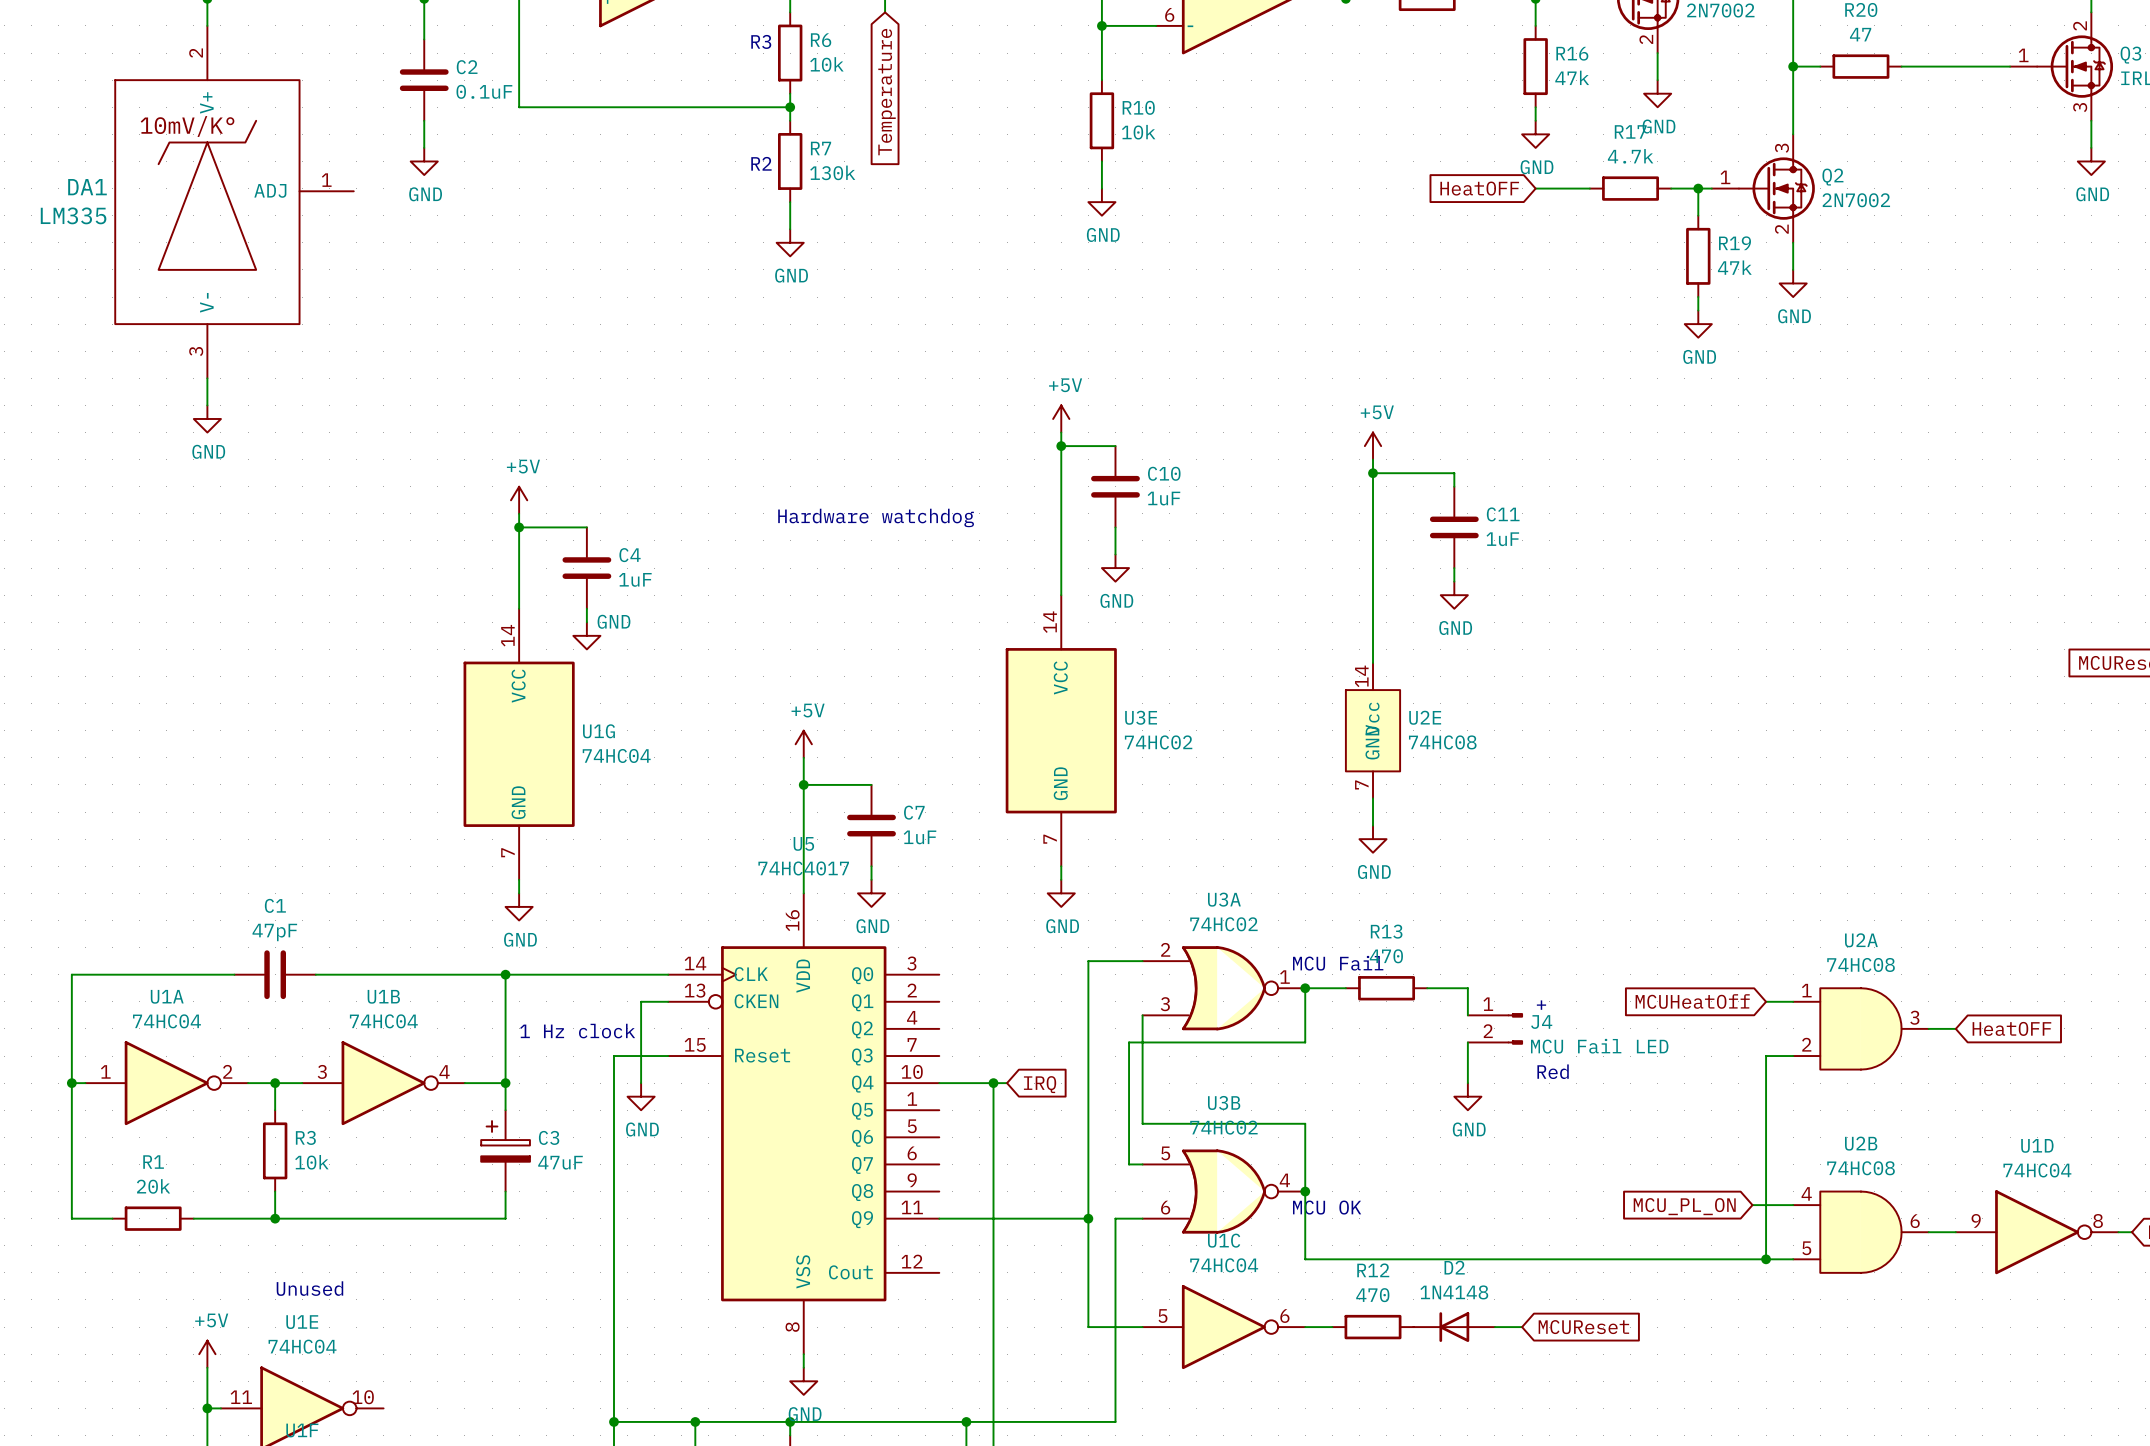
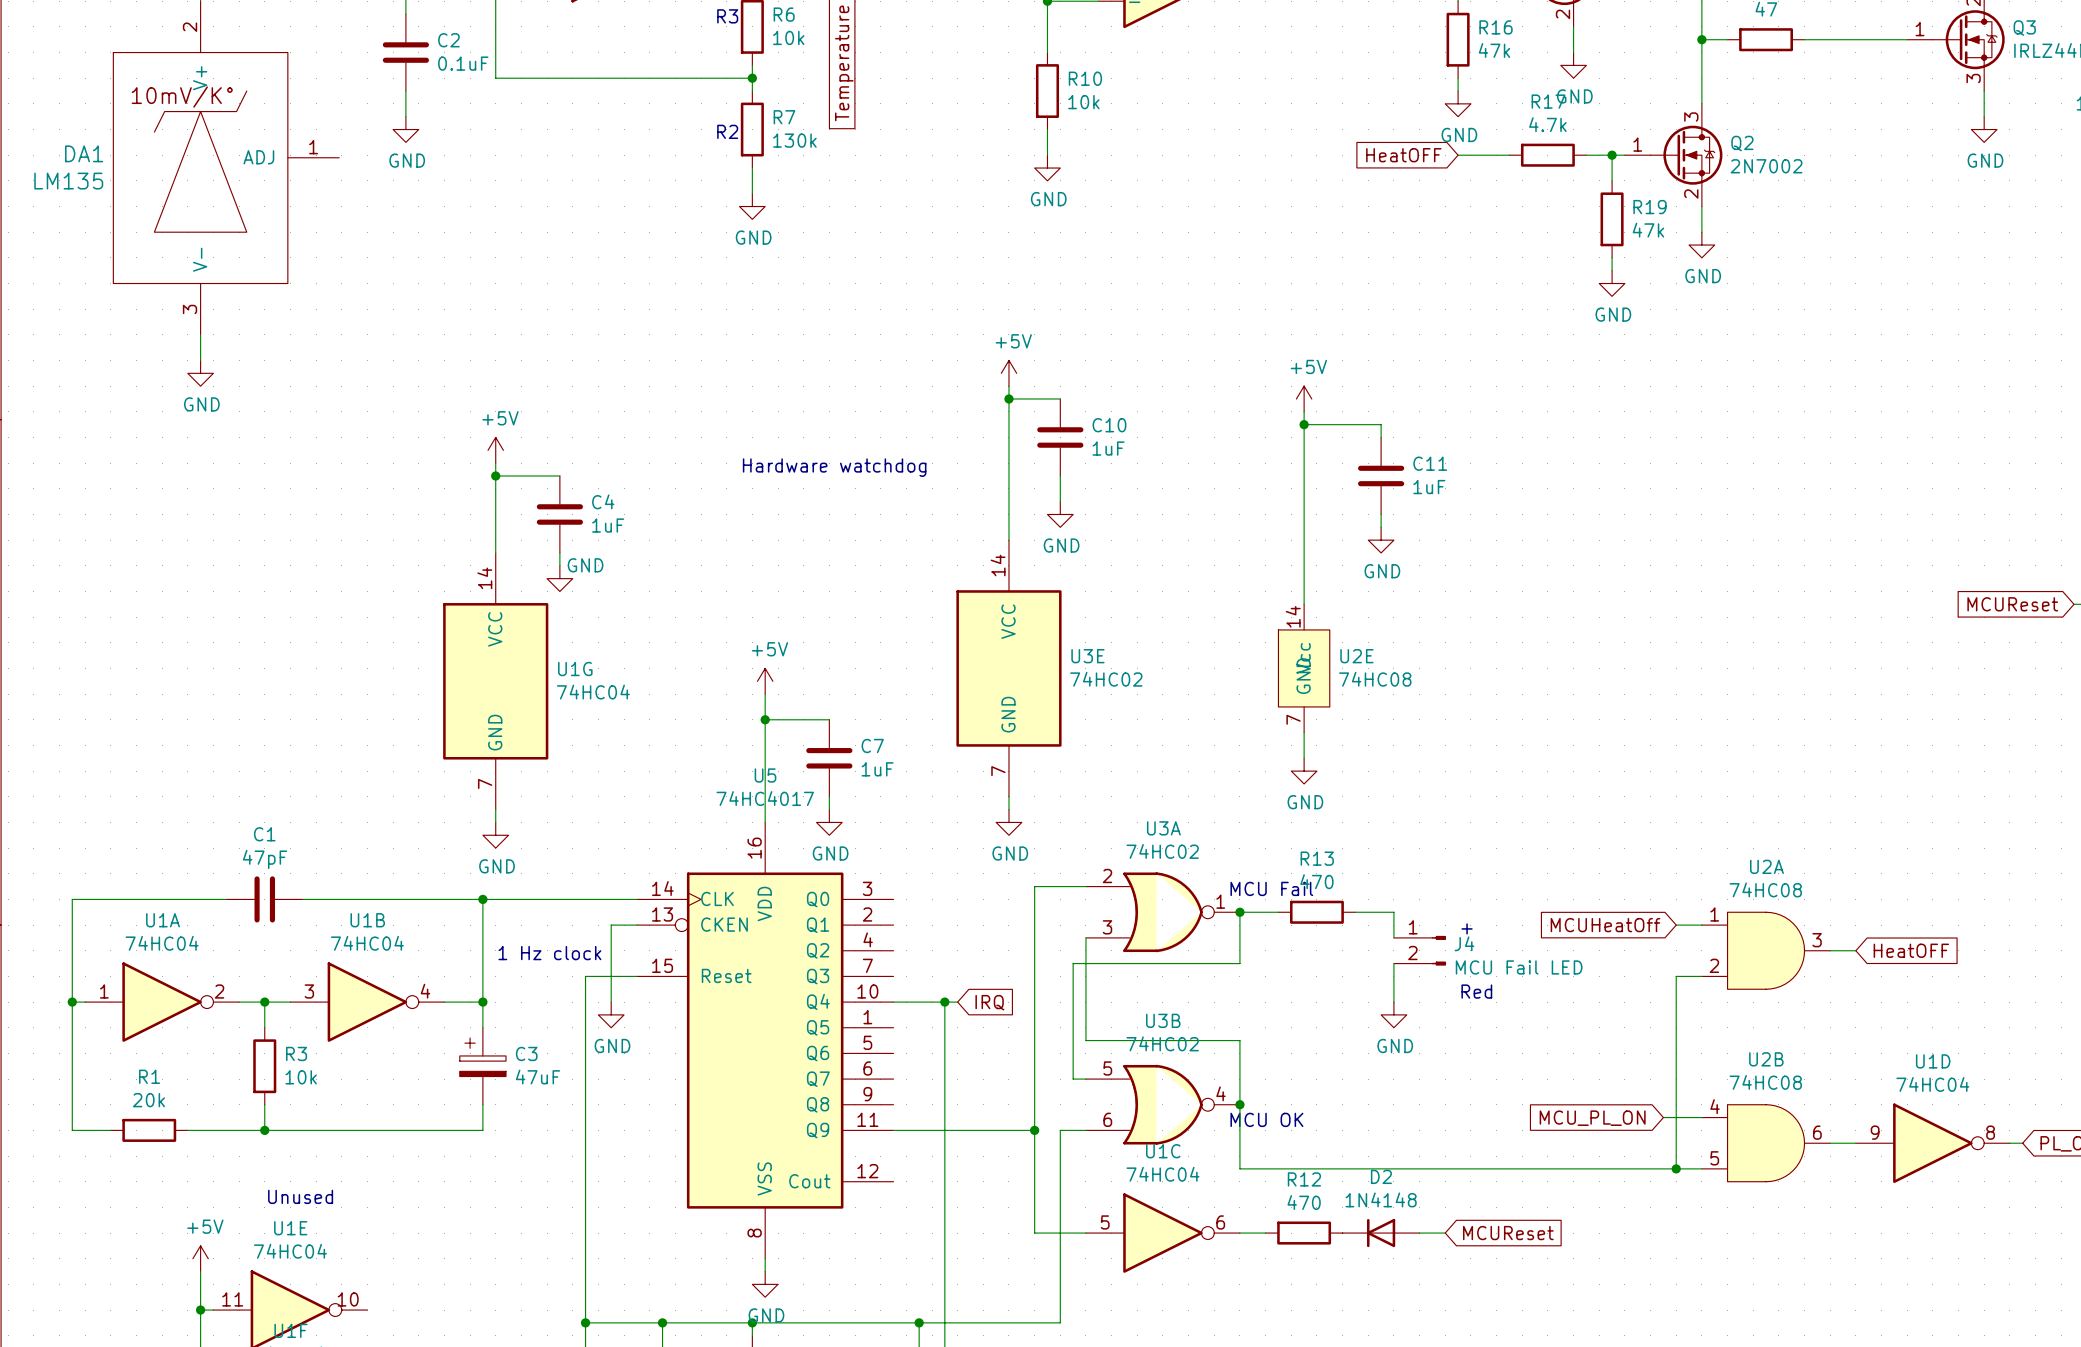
DA1 value: LM335 (73, 215) -> LM135 (68, 181)

